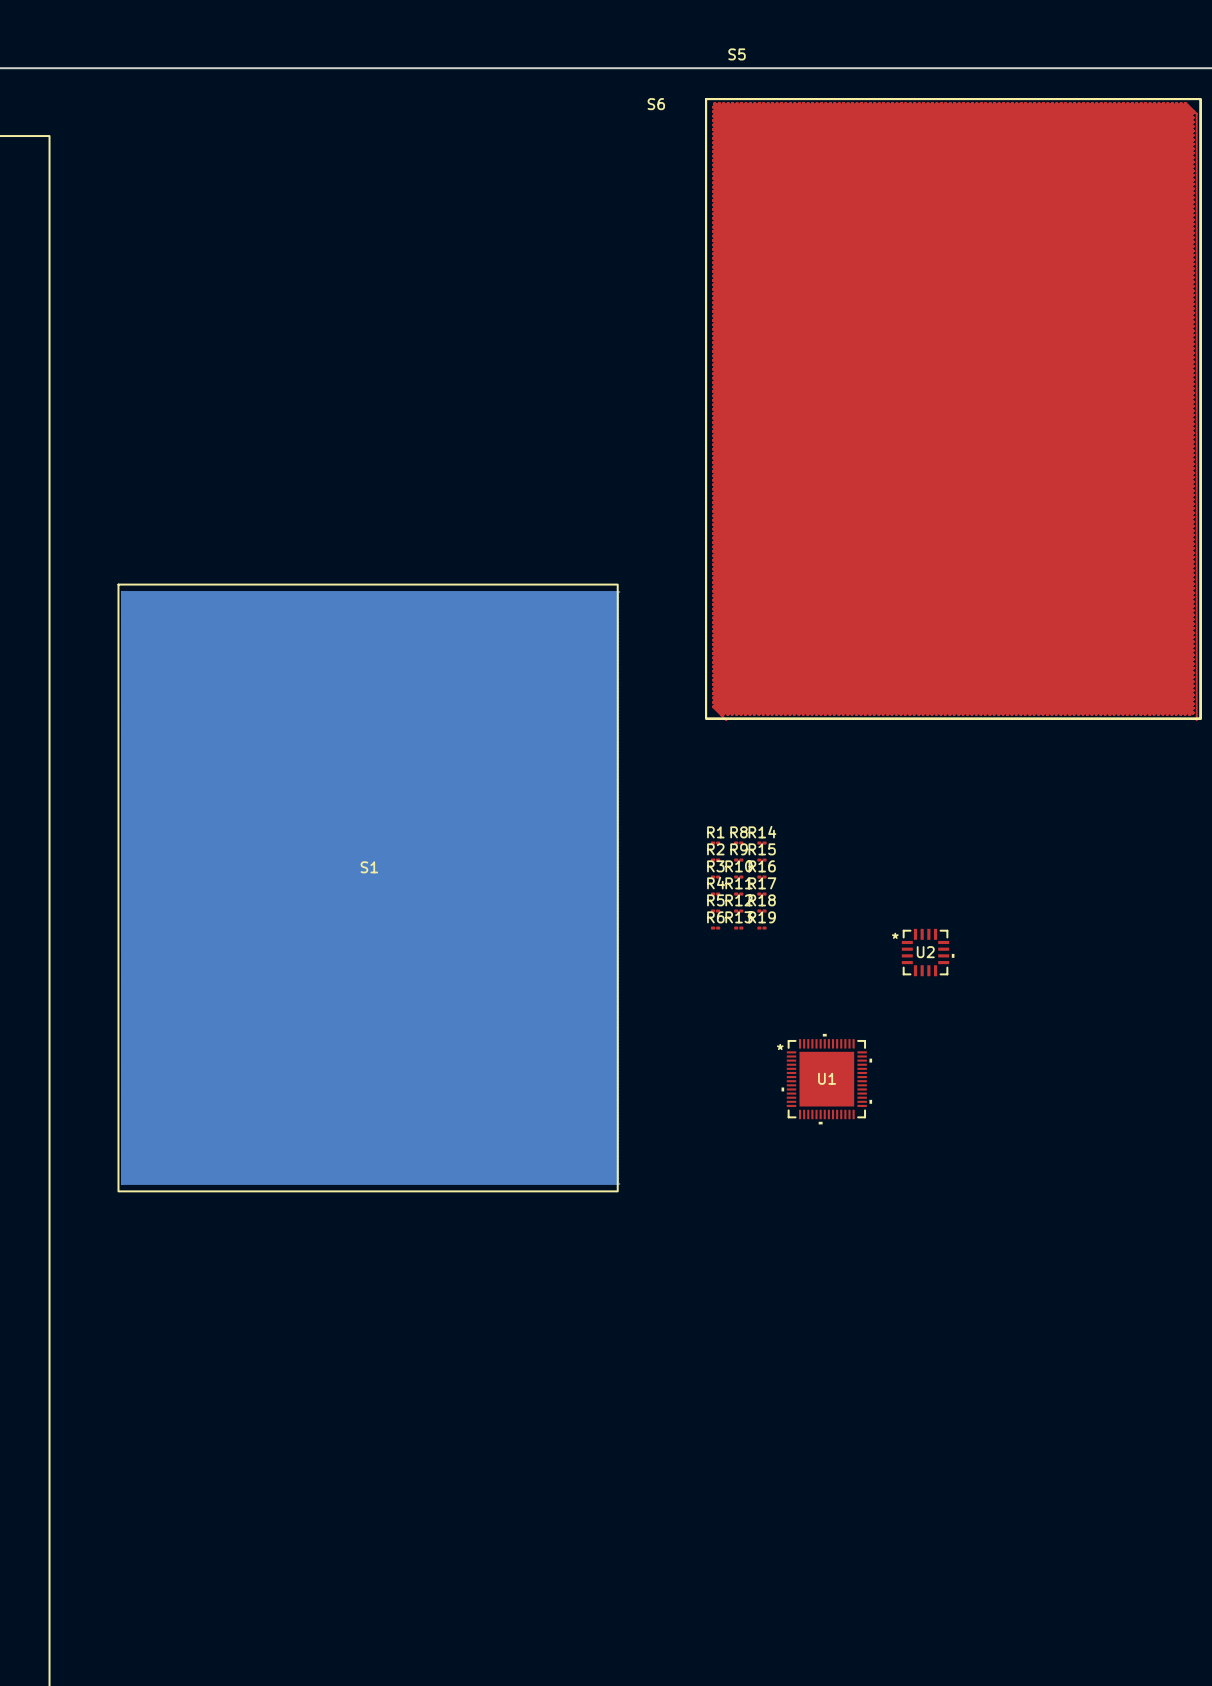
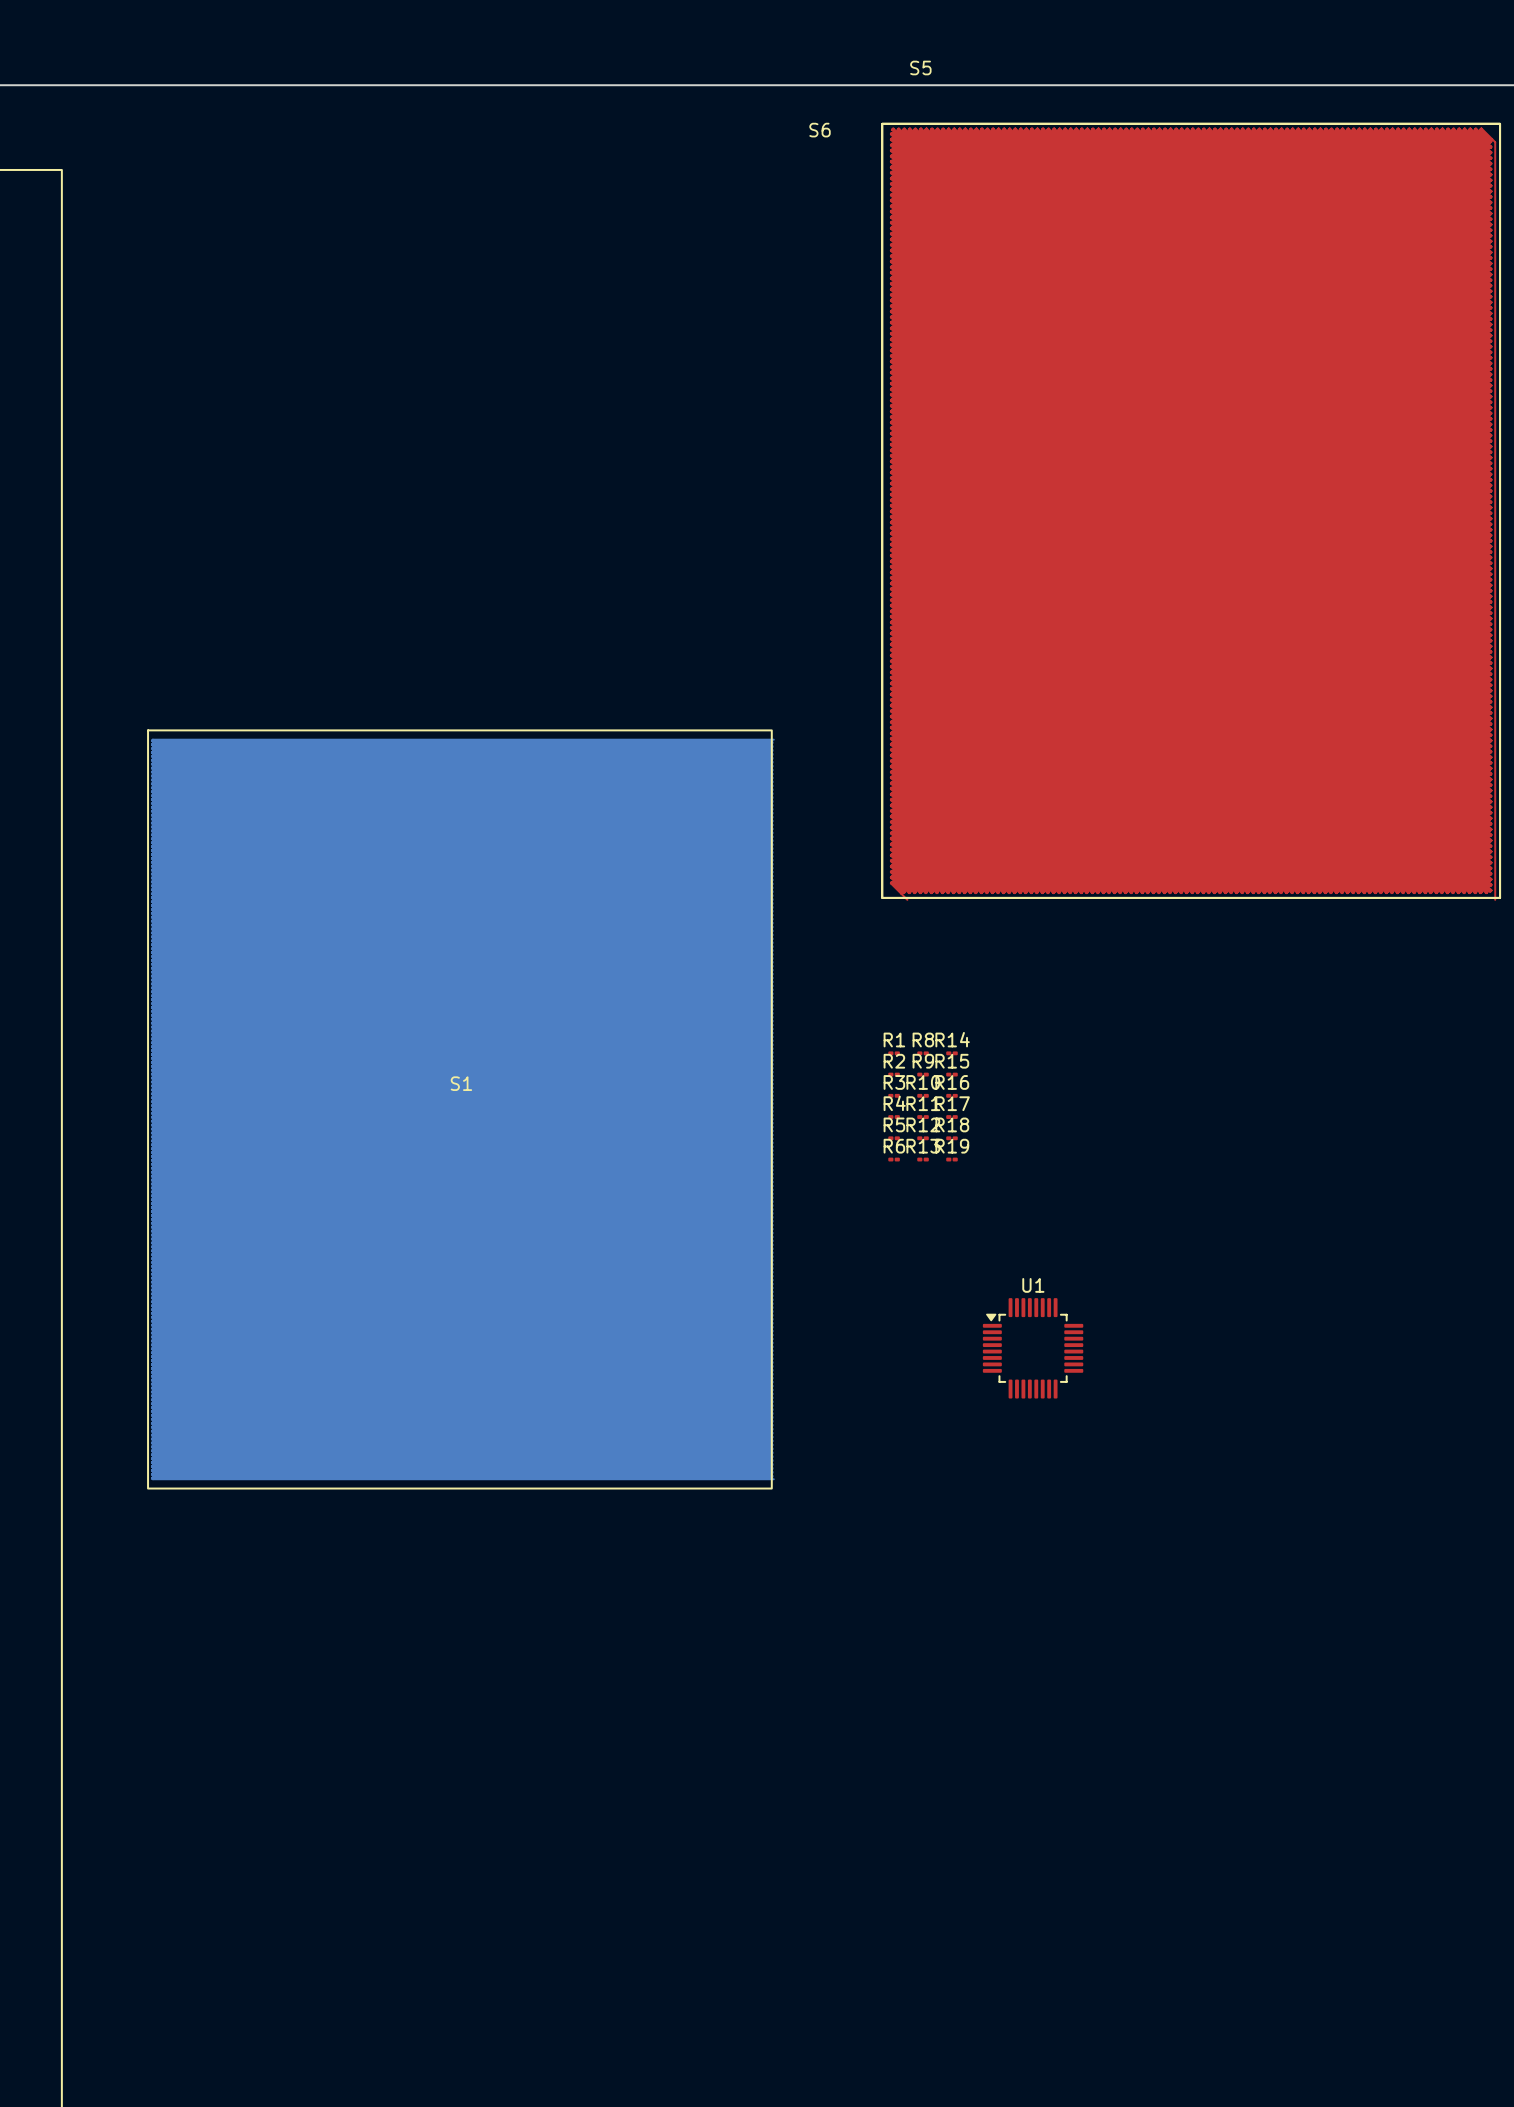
U2: (928, 952) -> none
U1 footprint: [781, 1033, 873, 1125] -> [982, 1298, 1084, 1399]
U1 name position: U1 (827, 1078) -> U1 (1033, 1285)

